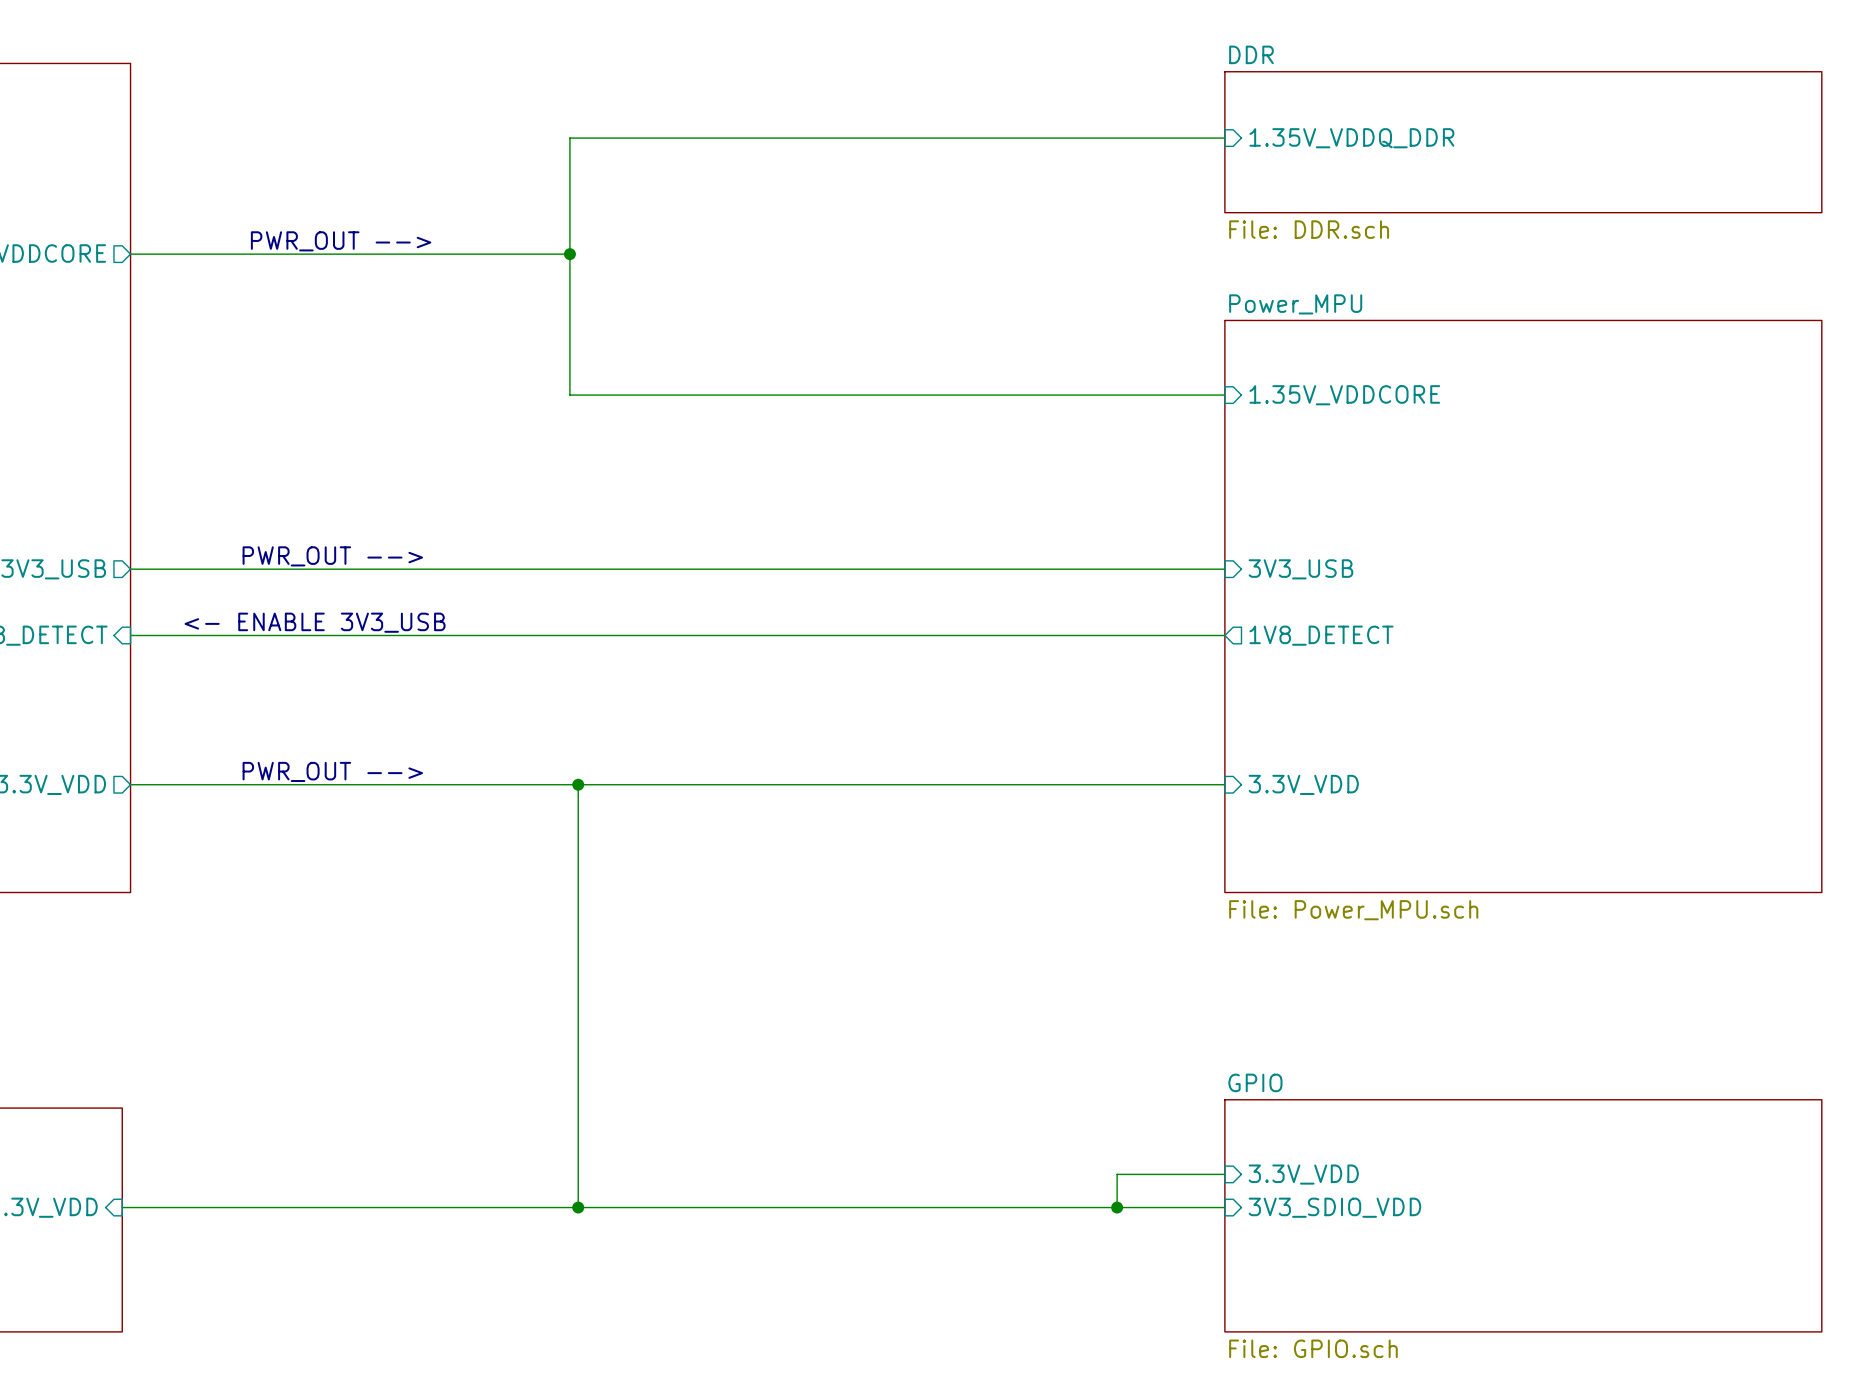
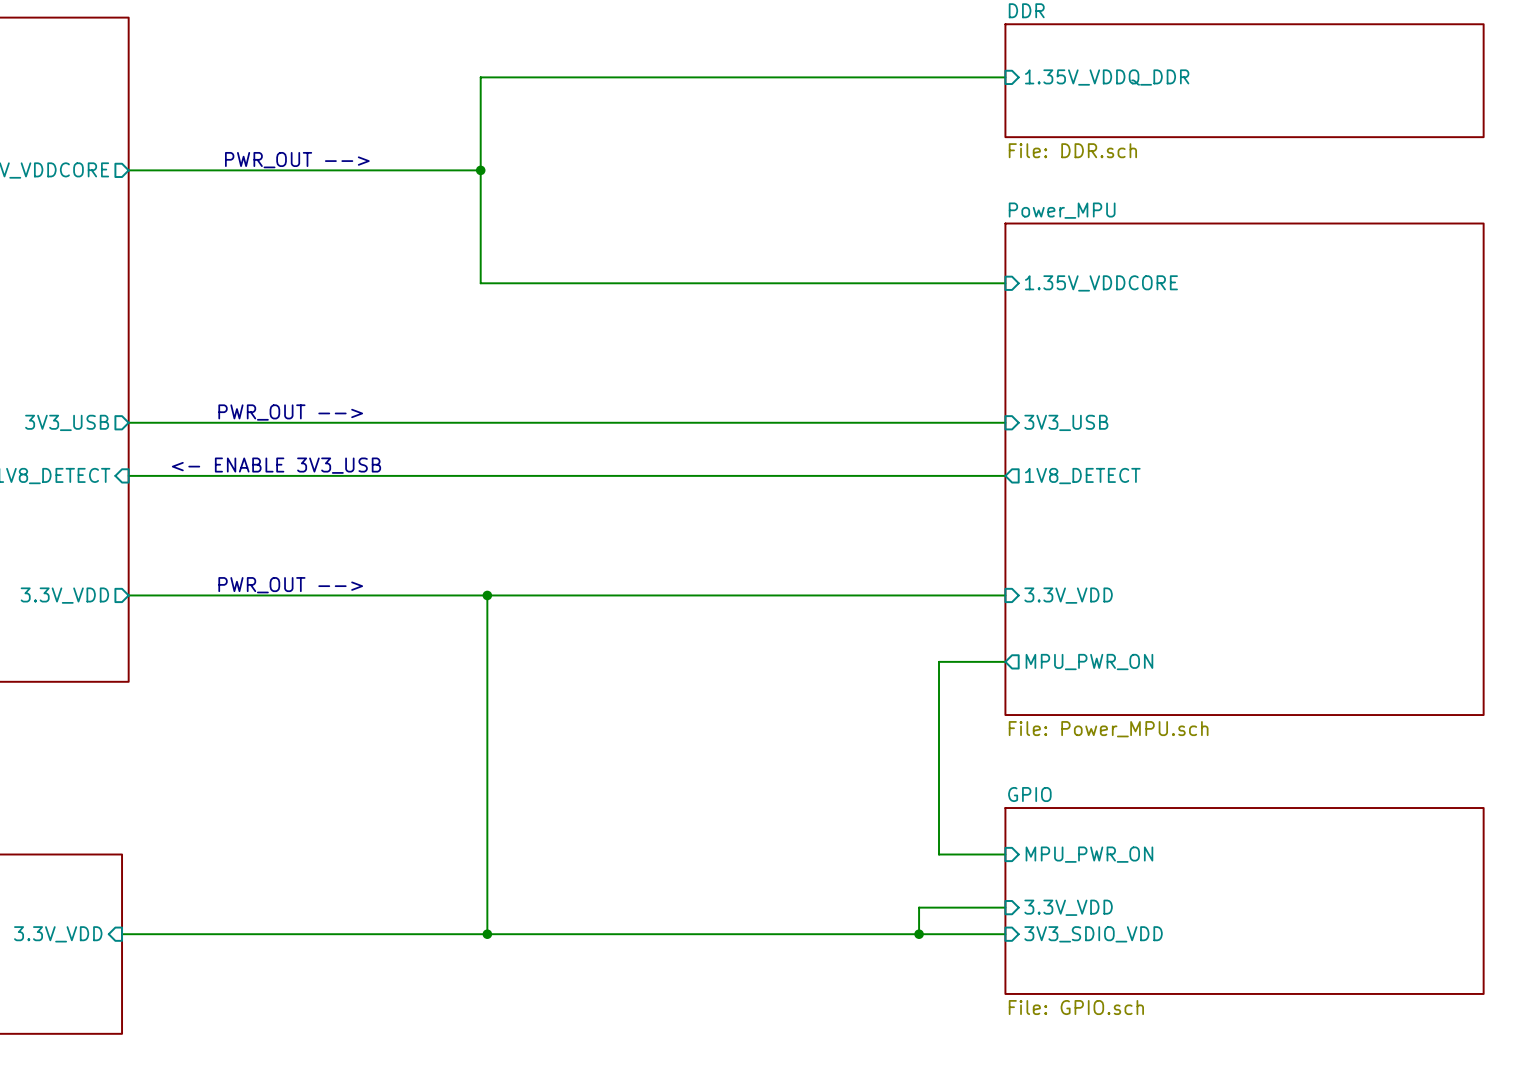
sheet Power_MPU: File: Power_MPU.sch (1523, 606) -> none
sheet Power_MPU: none -> File: Power_MPU.sch (1244, 469)
wire: none -> (1005, 661) (939, 661) (939, 854) (1005, 854)
sheet pin: none -> MPU_PWR_ON (1089, 662)
sheet pin: none -> MPU_PWR_ON (1089, 854)
sheet GPIO position: (1523, 1215) -> (1244, 900)

